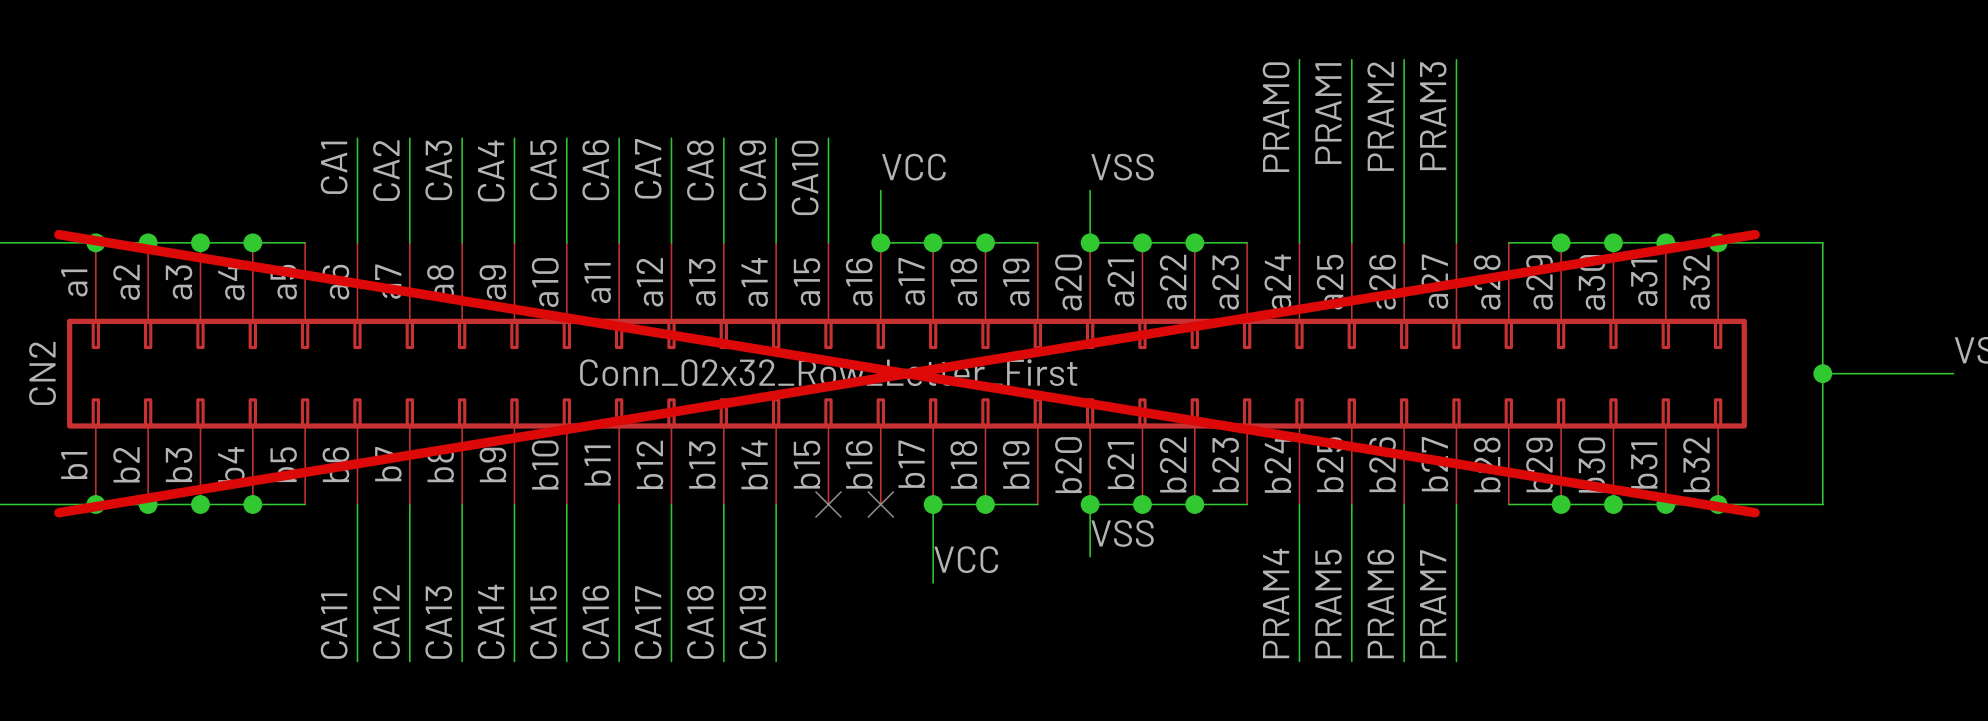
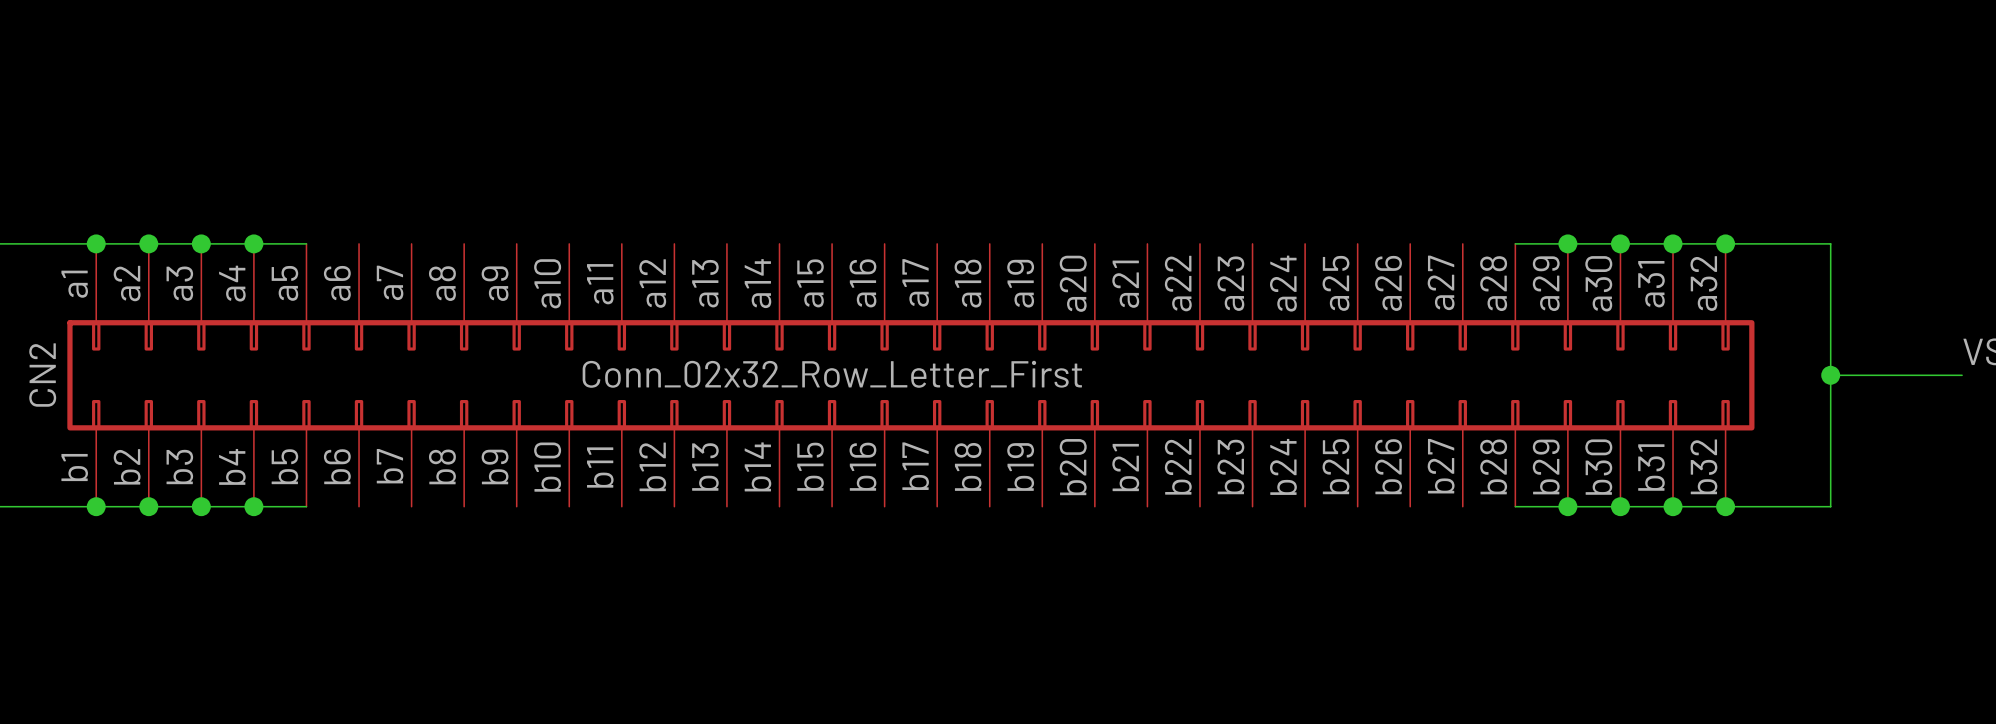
wire: (1299, 59) (1299, 242) -> none
wire: (1351, 59) (1351, 242) -> none
wire: (1404, 59) (1404, 242) -> none
wire: (1456, 59) (1456, 242) -> none
label: PRAM1 (1328, 113) -> none
label: PRAM2 (1380, 116) -> none
label: PRAM3 (1433, 116) -> none
label: PRAM0 (1276, 117) -> none
wire: (357, 138) (357, 242) -> none
wire: (409, 138) (409, 242) -> none
wire: (462, 138) (462, 242) -> none
wire: (514, 138) (514, 242) -> none
wire: (566, 138) (566, 242) -> none
wire: (619, 138) (619, 242) -> none
wire: (671, 138) (671, 242) -> none
wire: (723, 138) (723, 242) -> none
wire: (776, 138) (776, 242) -> none
wire: (828, 138) (828, 242) -> none
label: CA1 (334, 167) -> none
label: VCC (913, 167) -> none
label: VSS (1122, 167) -> none
label: CA7 (648, 168) -> none
label: CA2 (386, 170) -> none
label: CA3 (438, 170) -> none
label: CA4 (491, 170) -> none
label: CA5 (543, 170) -> none
label: CA6 (595, 170) -> none
label: CA8 (700, 170) -> none
label: CA9 (752, 170) -> none
label: CA10 (805, 177) -> none
wire: (880, 190) (880, 242) (1037, 242) -> none
wire: (1090, 190) (1090, 242) (1247, 242) -> none
junction: (880, 242) -> none
junction: (933, 242) -> none
junction: (985, 242) -> none
junction: (1090, 242) -> none
junction: (1142, 242) -> none
junction: (1194, 242) -> none
CN2 do-not-place cross: (906, 373) -> none
wire: (357, 504) (357, 661) -> none
wire: (409, 504) (409, 661) -> none
wire: (462, 504) (462, 661) -> none
wire: (514, 504) (514, 661) -> none
wire: (566, 504) (566, 661) -> none
wire: (619, 504) (619, 661) -> none
wire: (671, 504) (671, 661) -> none
wire: (723, 504) (723, 661) -> none
wire: (776, 504) (776, 661) -> none
no-connect mark: (828, 504) -> none
no-connect mark: (880, 504) -> none
junction: (933, 504) -> none
junction: (985, 504) -> none
wire: (1037, 504) (933, 504) (933, 583) -> none
junction: (1090, 504) -> none
junction: (1142, 504) -> none
junction: (1194, 504) -> none
wire: (1247, 504) (1090, 504) (1090, 556) -> none
wire: (1299, 504) (1299, 661) -> none
wire: (1351, 504) (1351, 661) -> none
wire: (1404, 504) (1404, 661) -> none
wire: (1456, 504) (1456, 661) -> none
label: VSS (1122, 533) -> none
label: VCC (966, 559) -> none
label: PRAM4 (1276, 603) -> none
label: PRAM5 (1328, 603) -> none
label: PRAM6 (1380, 603) -> none
label: PRAM7 (1433, 604) -> none
label: CA12 (386, 621) -> none
label: CA14 (491, 621) -> none
label: CA13 (438, 622) -> none
label: CA15 (543, 622) -> none
label: CA16 (595, 622) -> none
label: CA17 (648, 622) -> none
label: CA18 (700, 622) -> none
label: CA19 (752, 622) -> none
label: CA11 (334, 626) -> none

